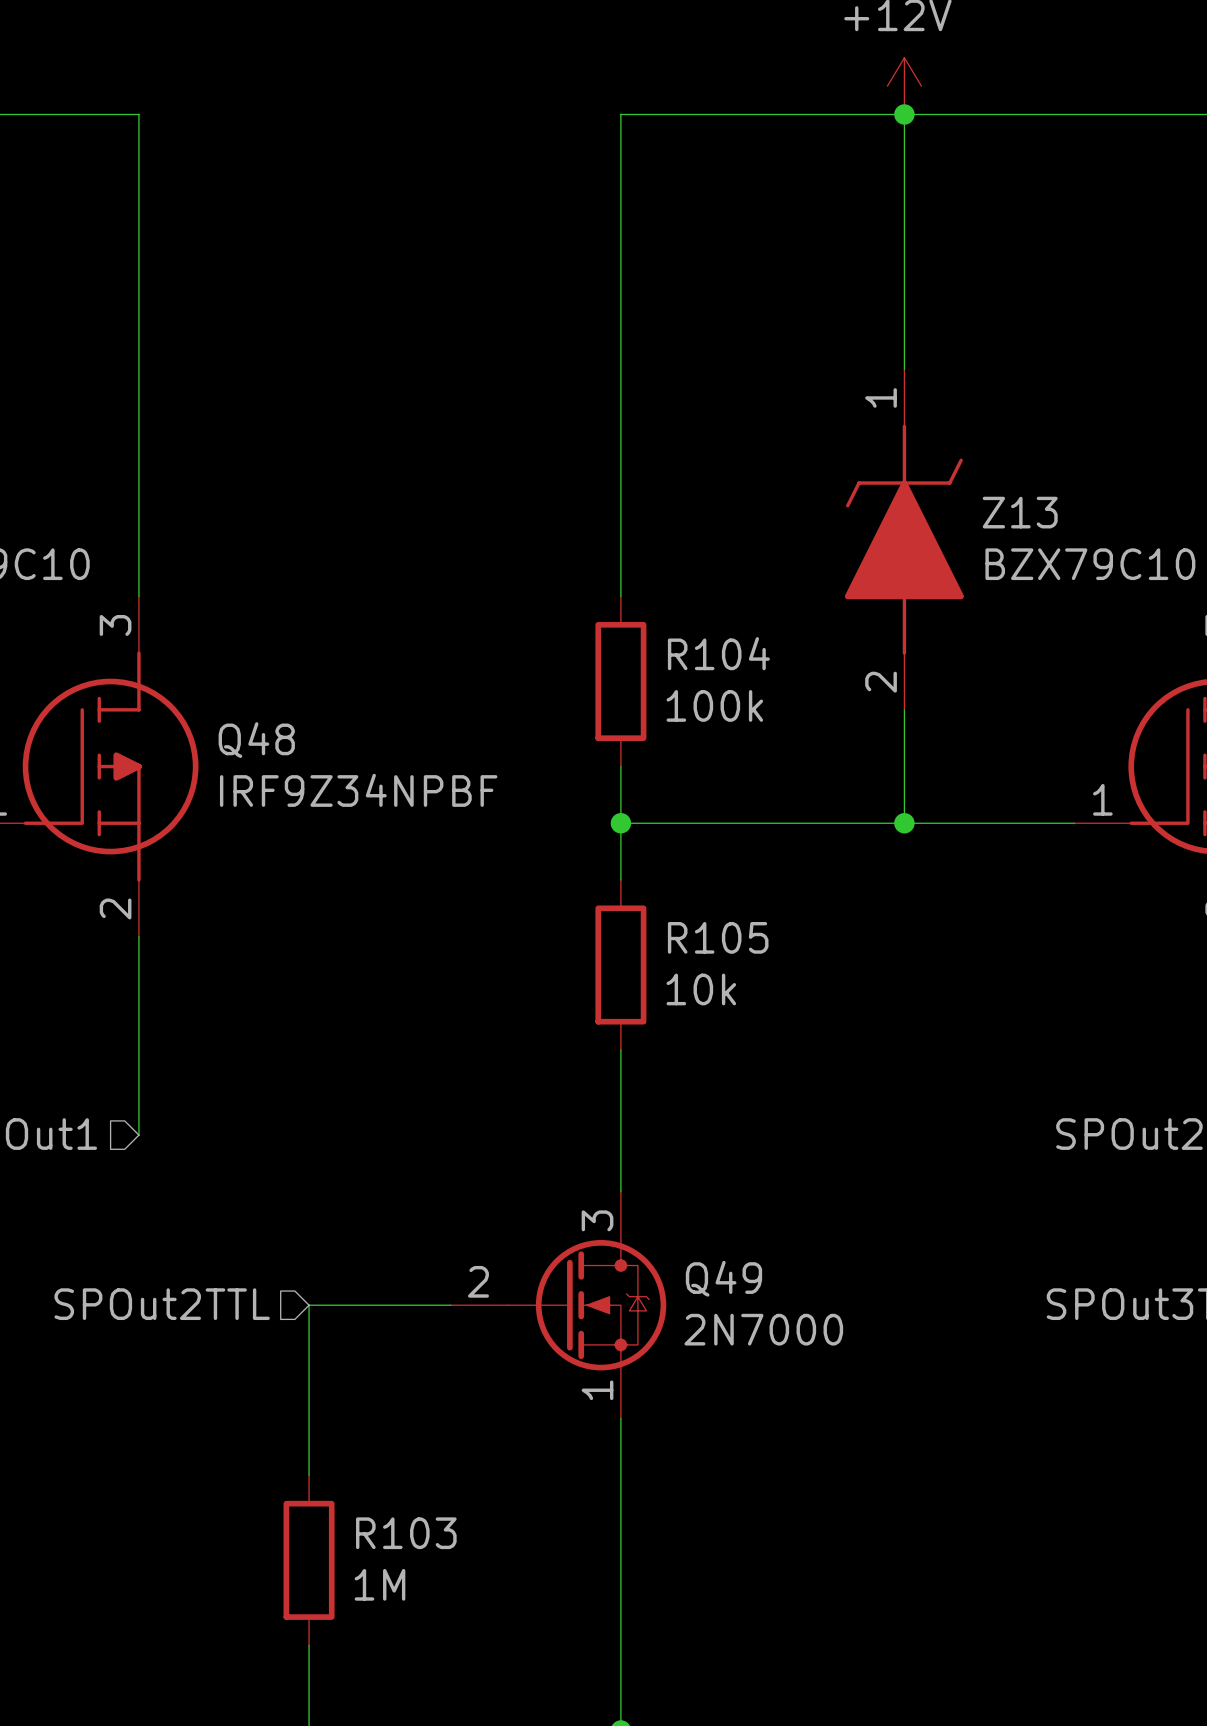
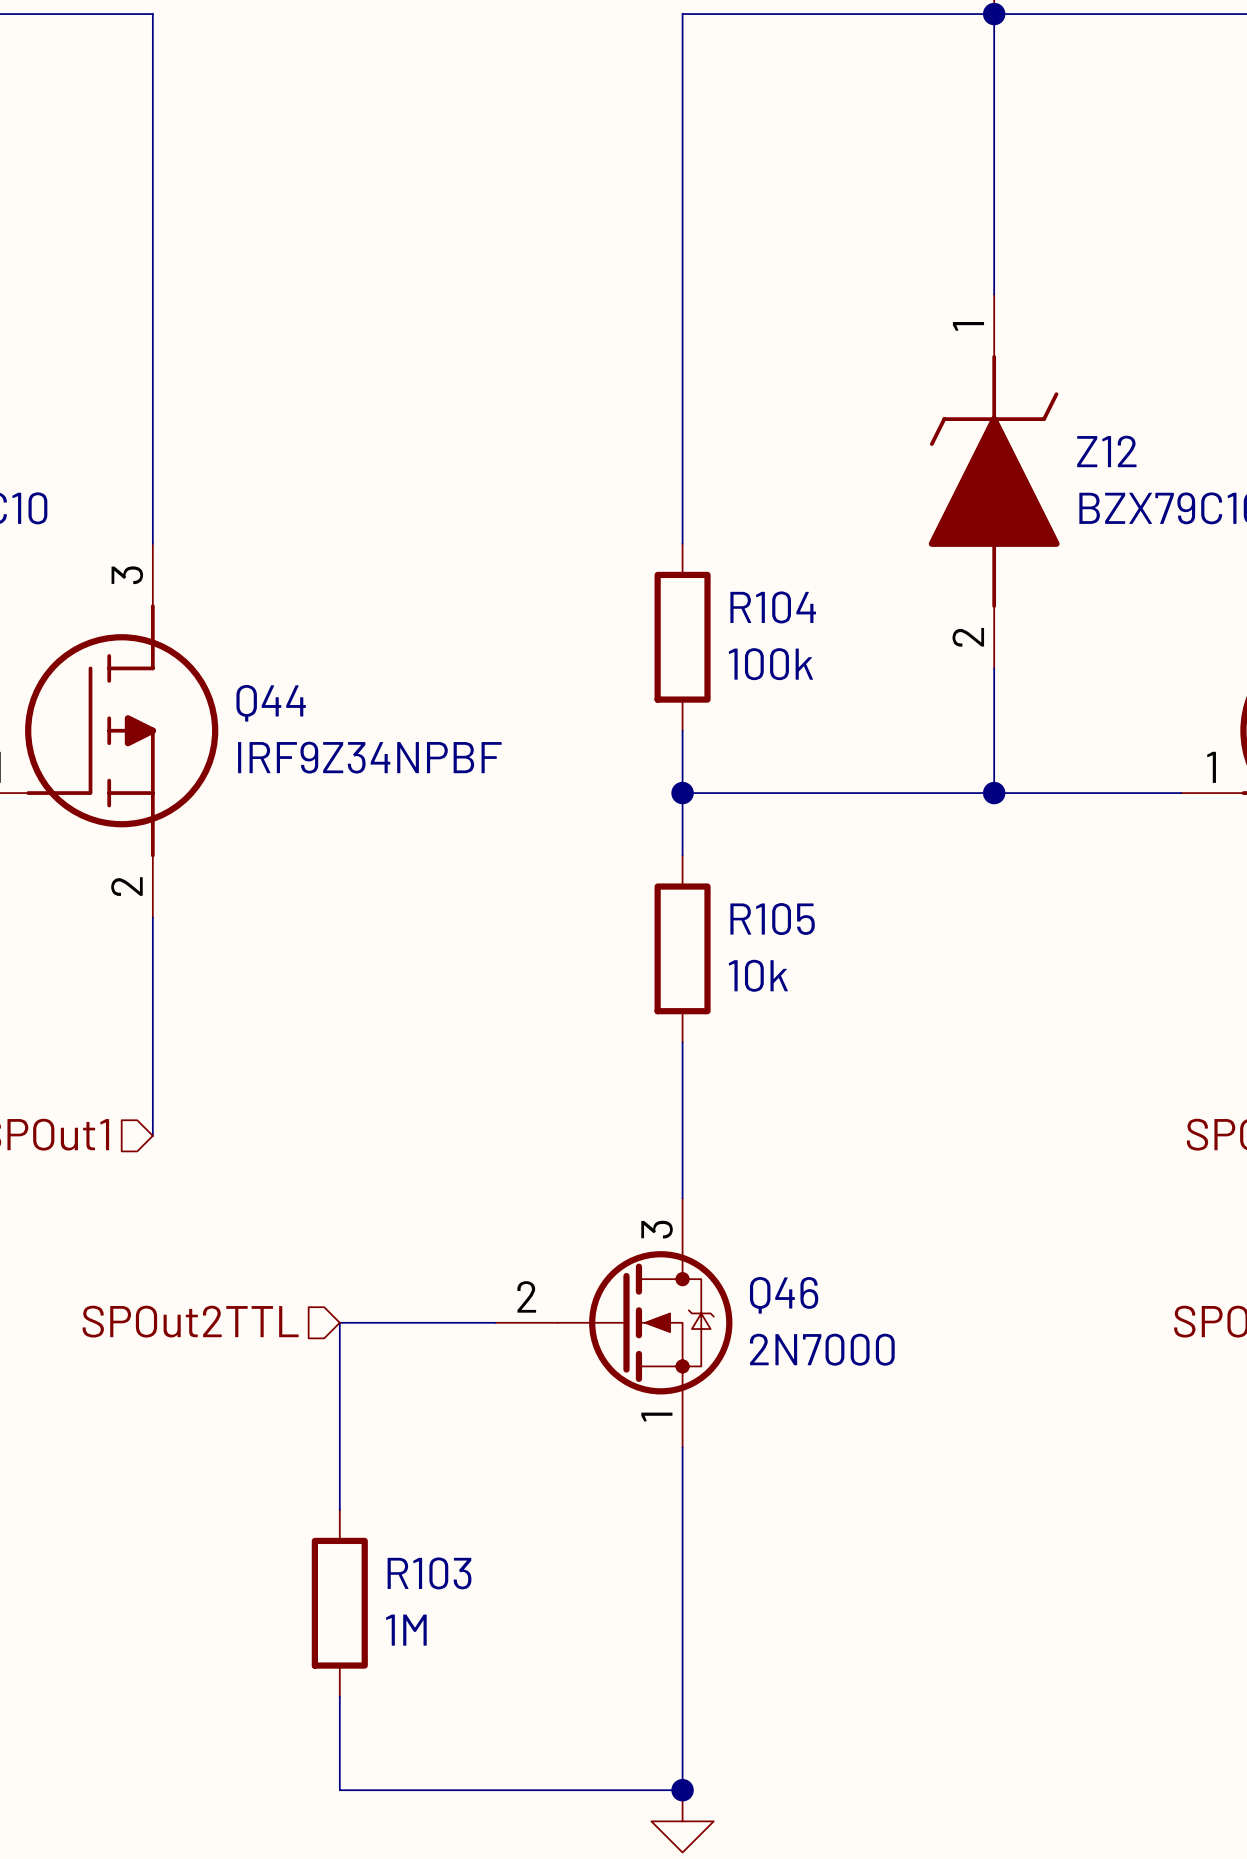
Z13 name: Z13 (1020, 512) -> Z12 (1106, 451)
Q48 name: Q48 (256, 740) -> Q44 (271, 703)
Q49 name: Q49 (723, 1278) -> Q46 (784, 1295)

